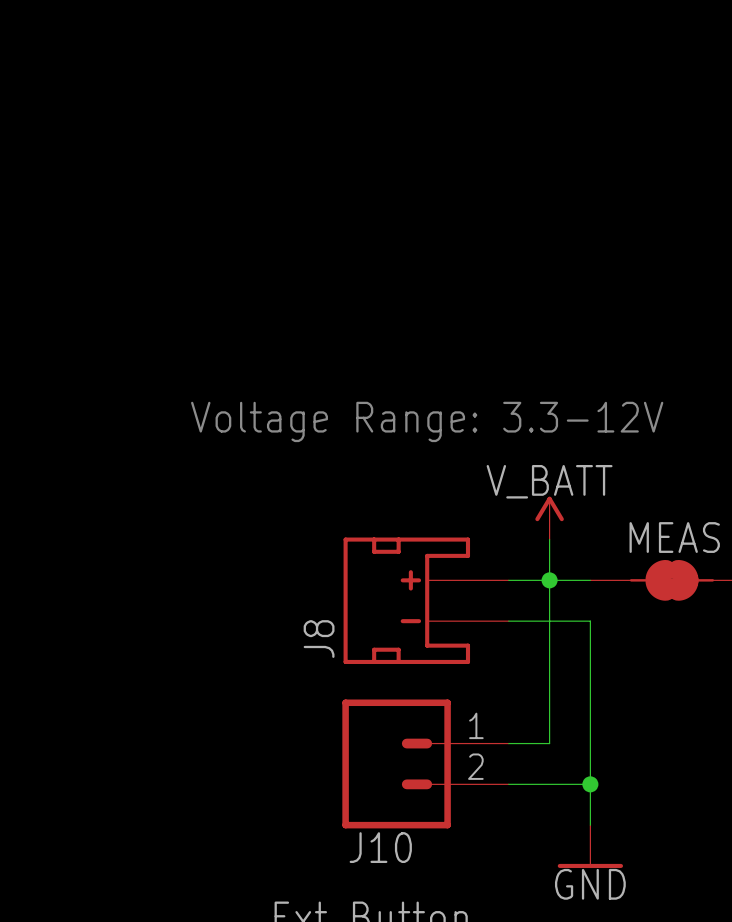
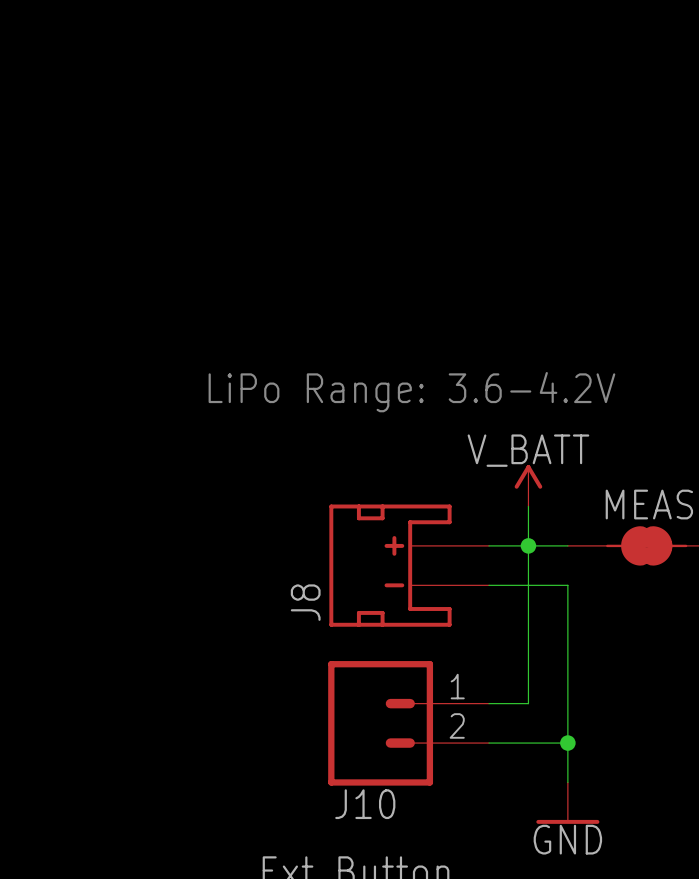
text: Voltage Range: 3.3-12V (427, 421) -> LiPo Range: 3.6-4.2V (411, 392)

